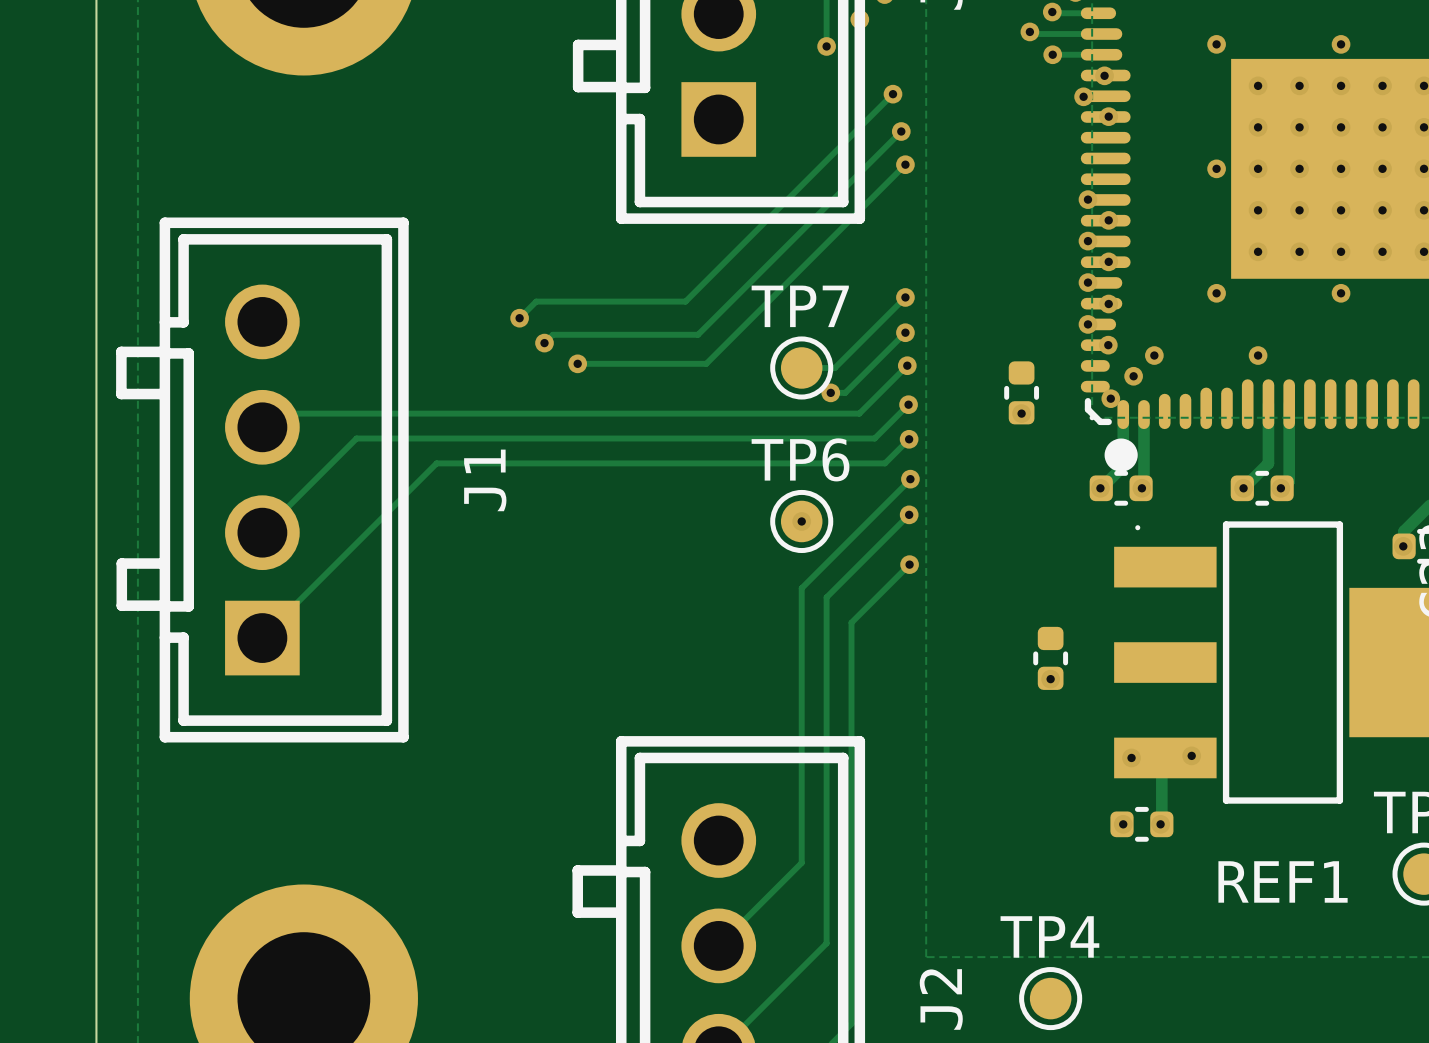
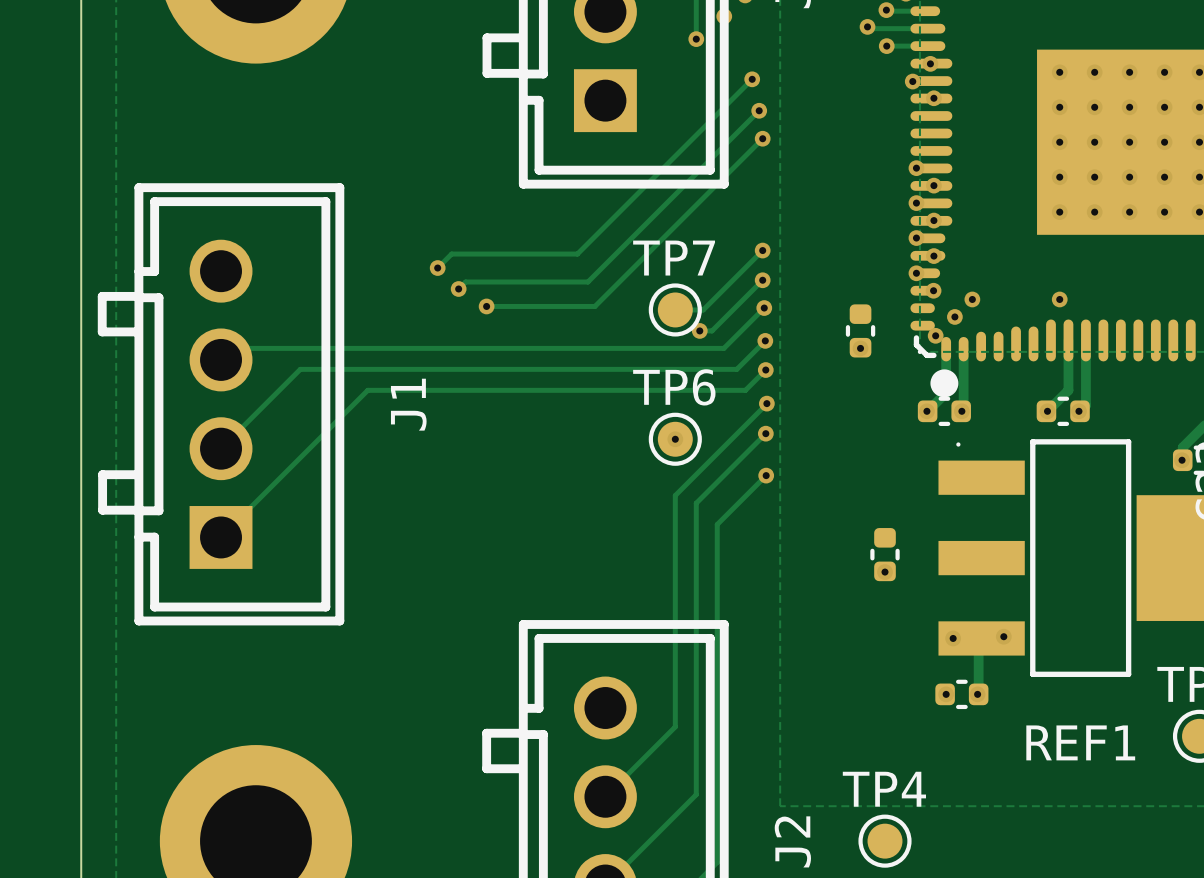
via: (1216, 44) -> none
via: (1341, 44) -> none
via: (1216, 168) -> none
via: (1216, 293) -> none
via: (1341, 293) -> none

